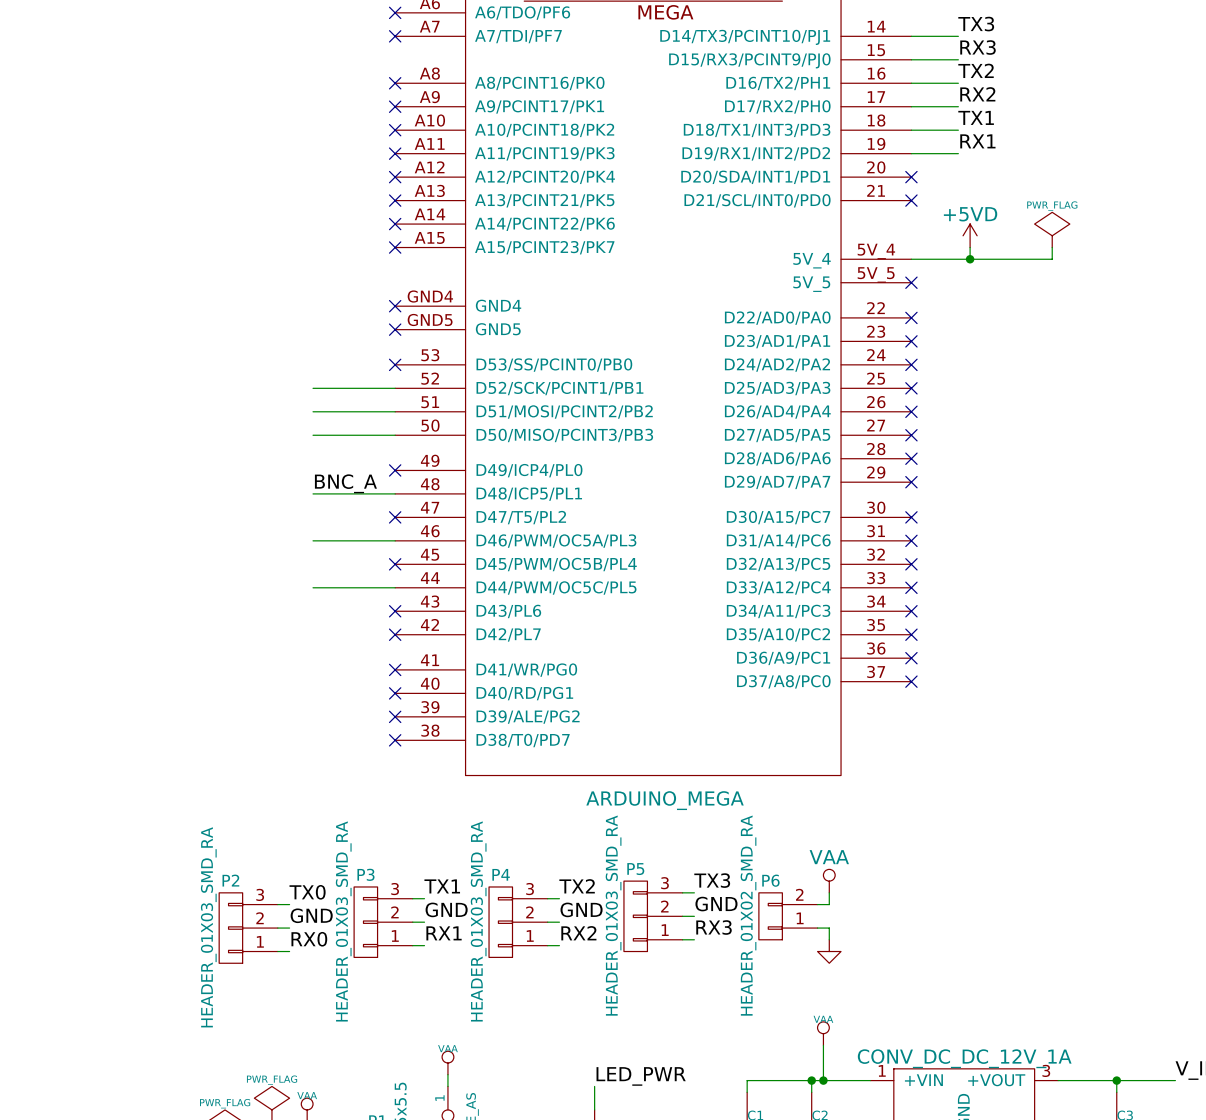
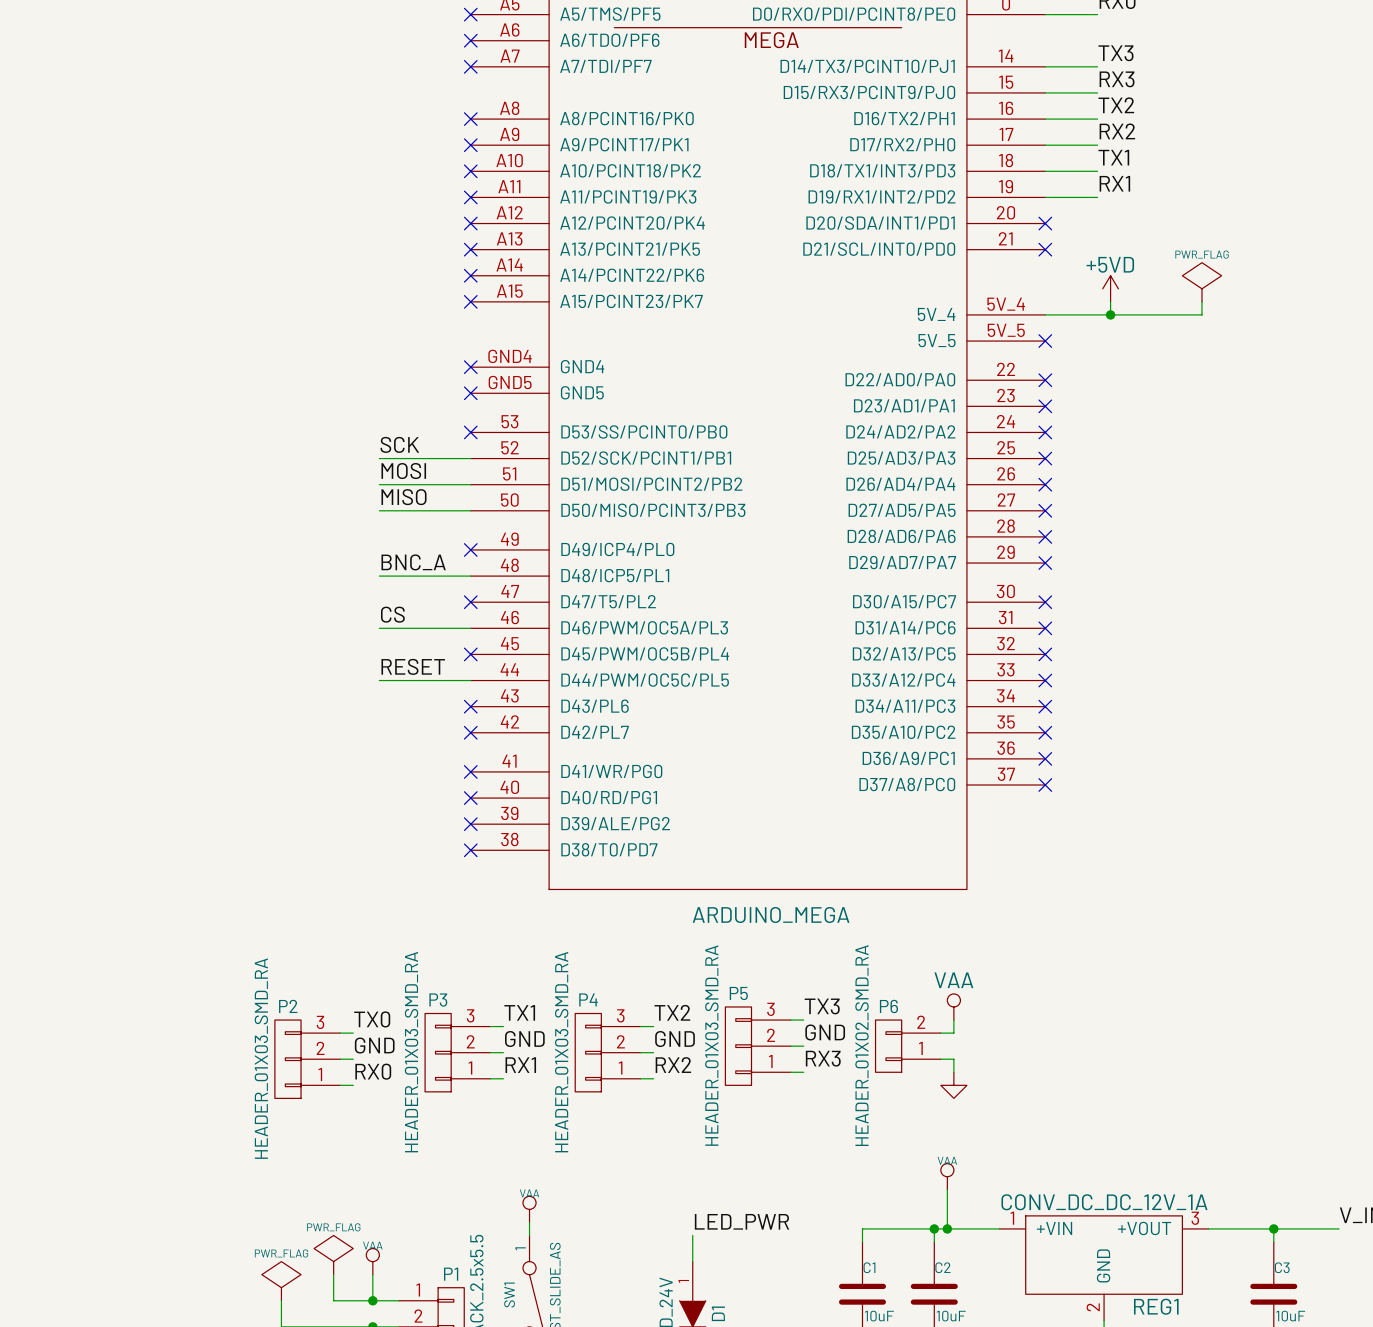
label: none -> SCK (399, 444)
label: none -> MOSI (403, 471)
label: none -> MISO (404, 497)
label: none -> CS (392, 614)
label: none -> RESET (413, 666)

